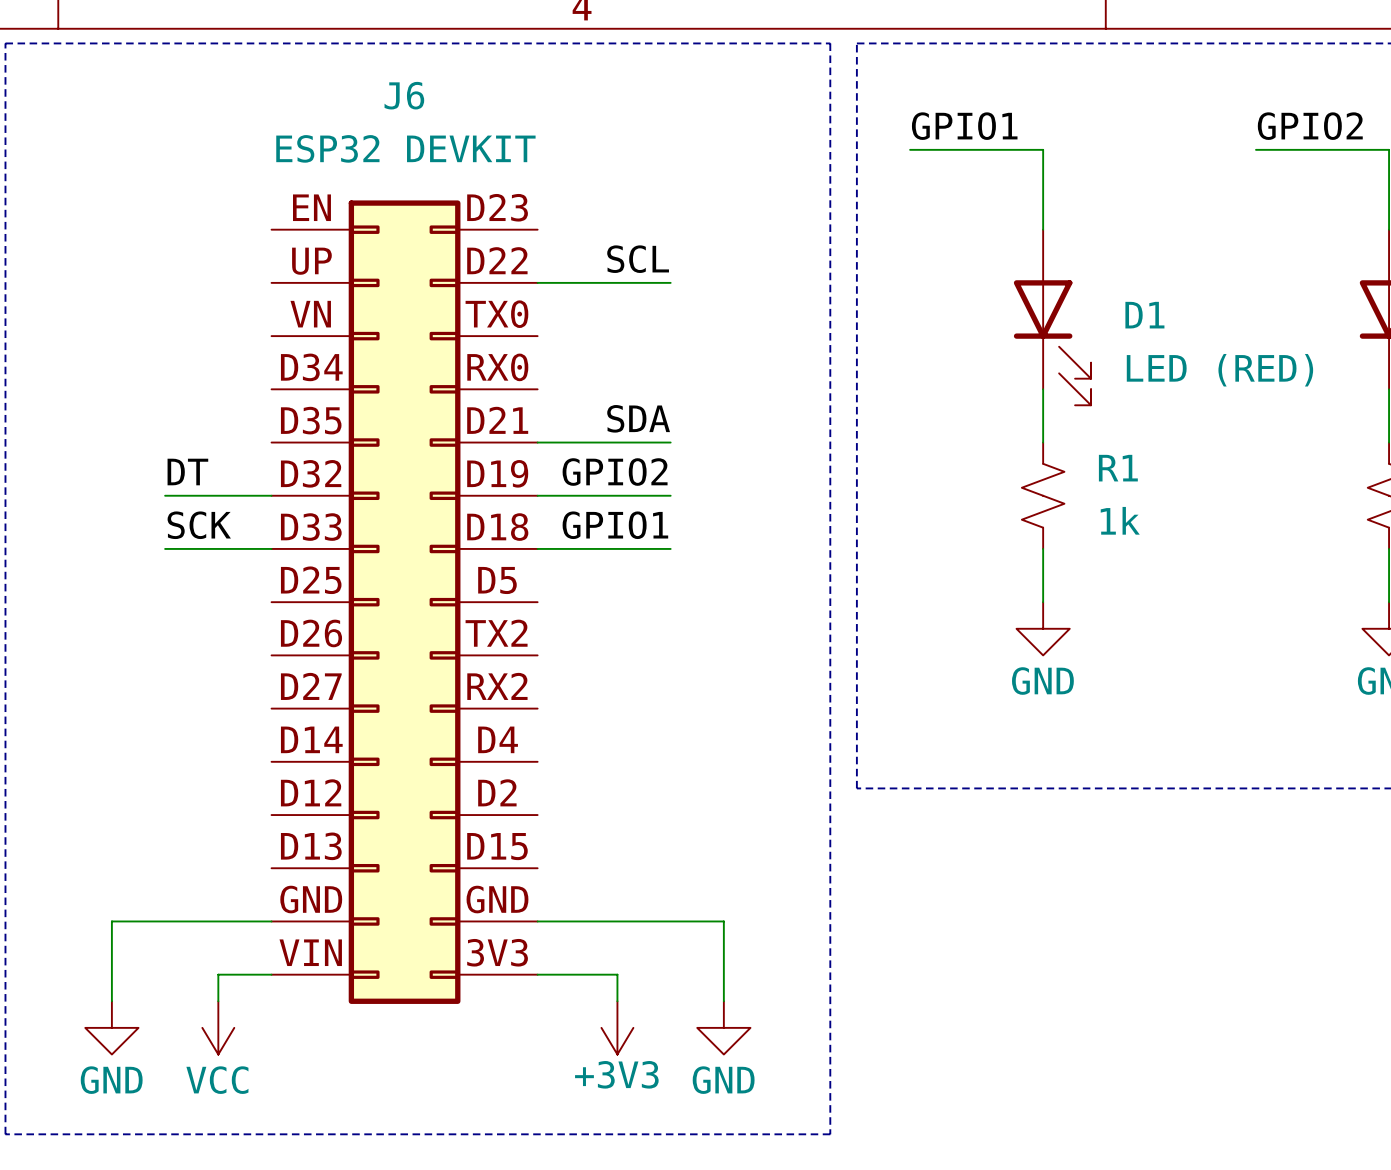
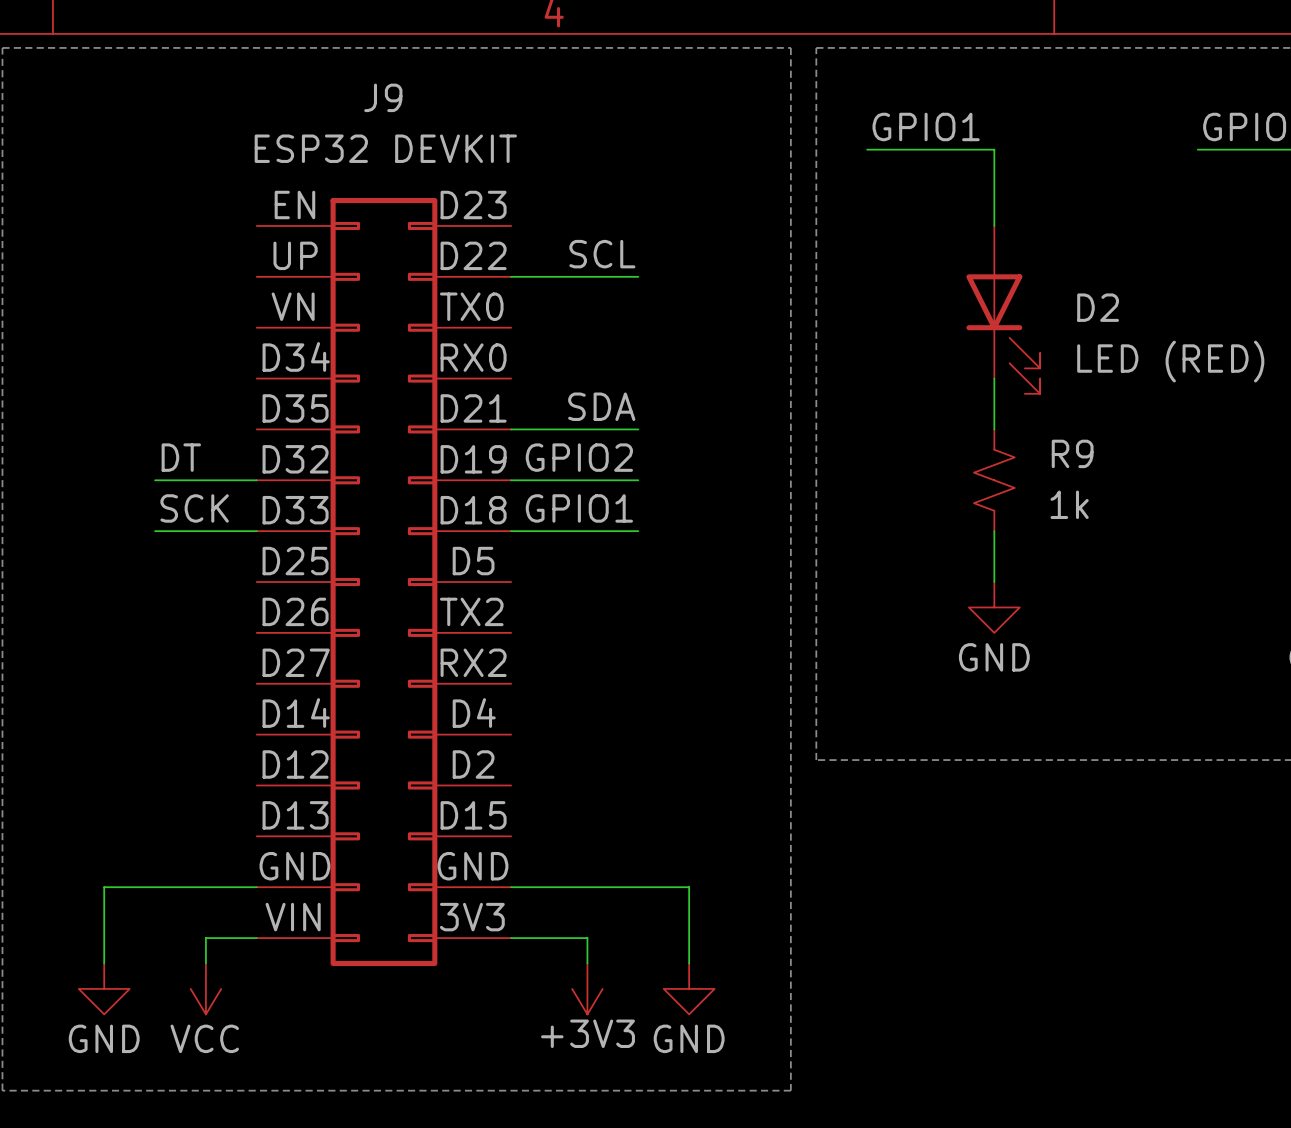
J6 name: J6 (404, 95) -> J9 (383, 97)
D1 name: D1 (1144, 315) -> D2 (1098, 307)
R1 name: R1 (1118, 468) -> R9 (1072, 453)

